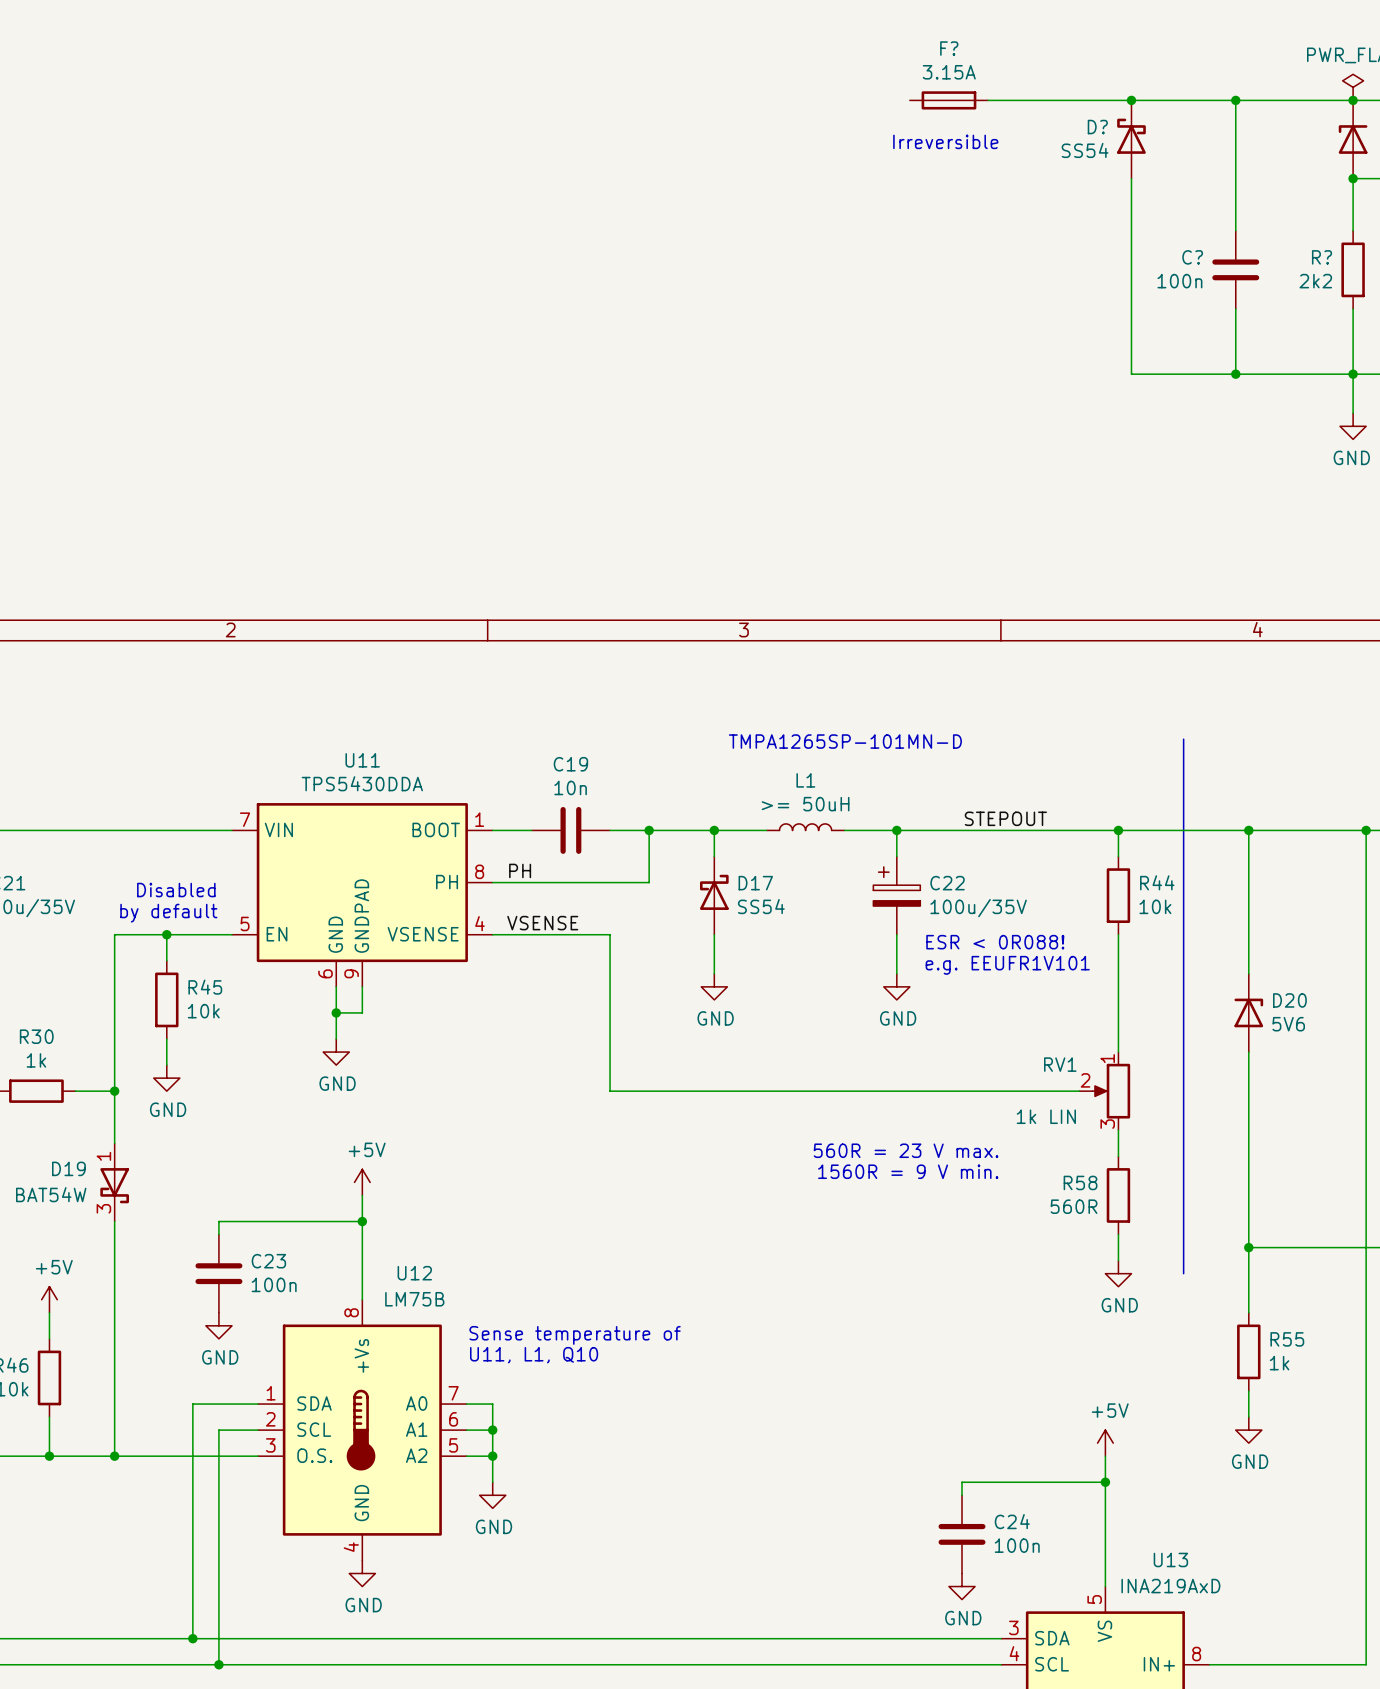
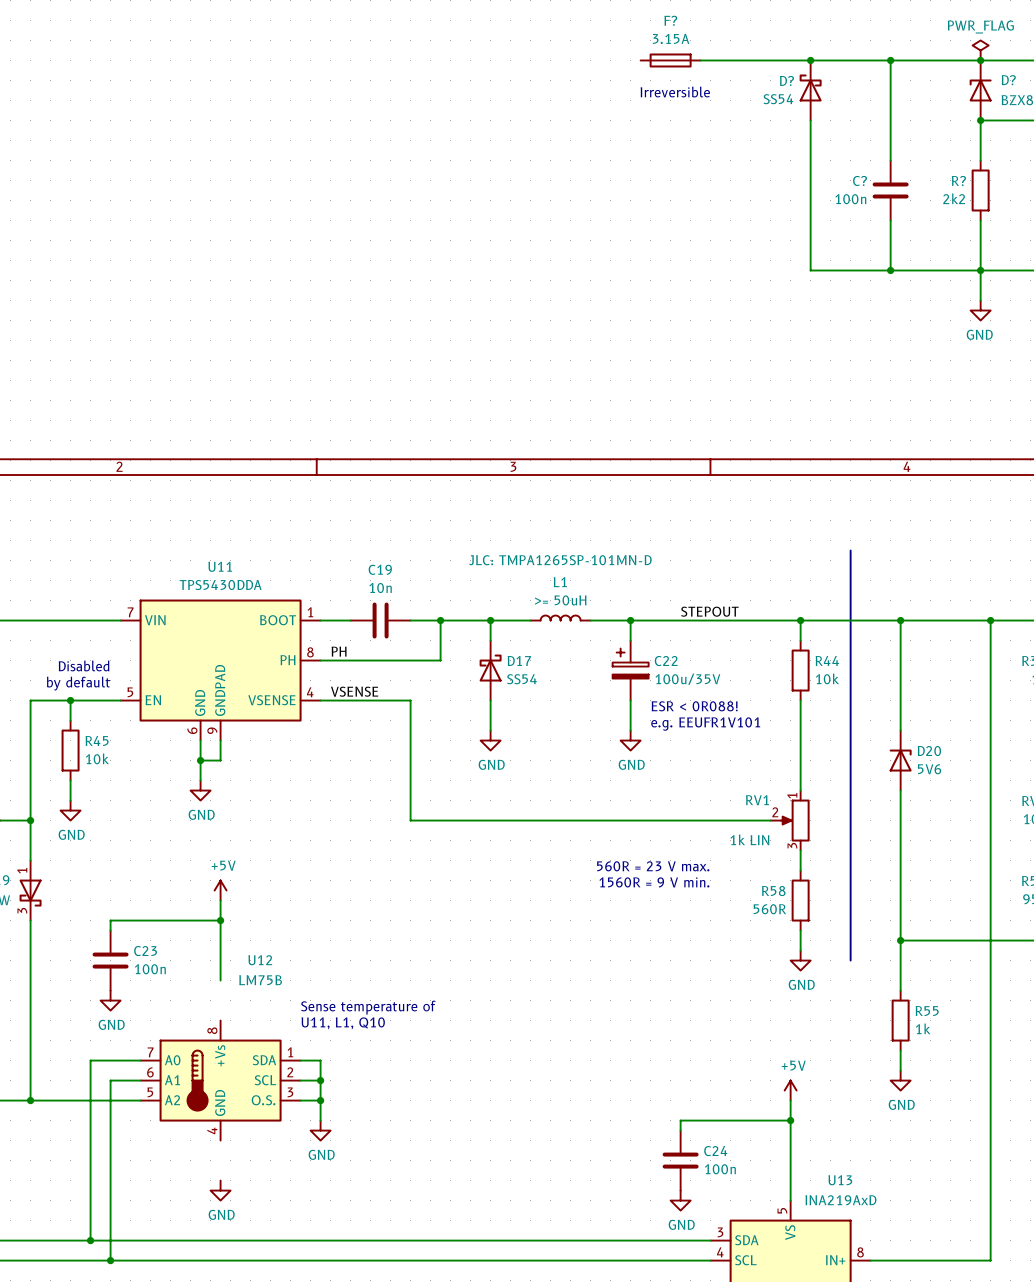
text: TMPA1265SP-101MN-D (845, 741) -> none
L1 text: none -> JLC: TMPA1265SP-101MN-D (560, 560)
U12 symbol: [258, 1299, 467, 1561] -> [140, 1020, 301, 1141]

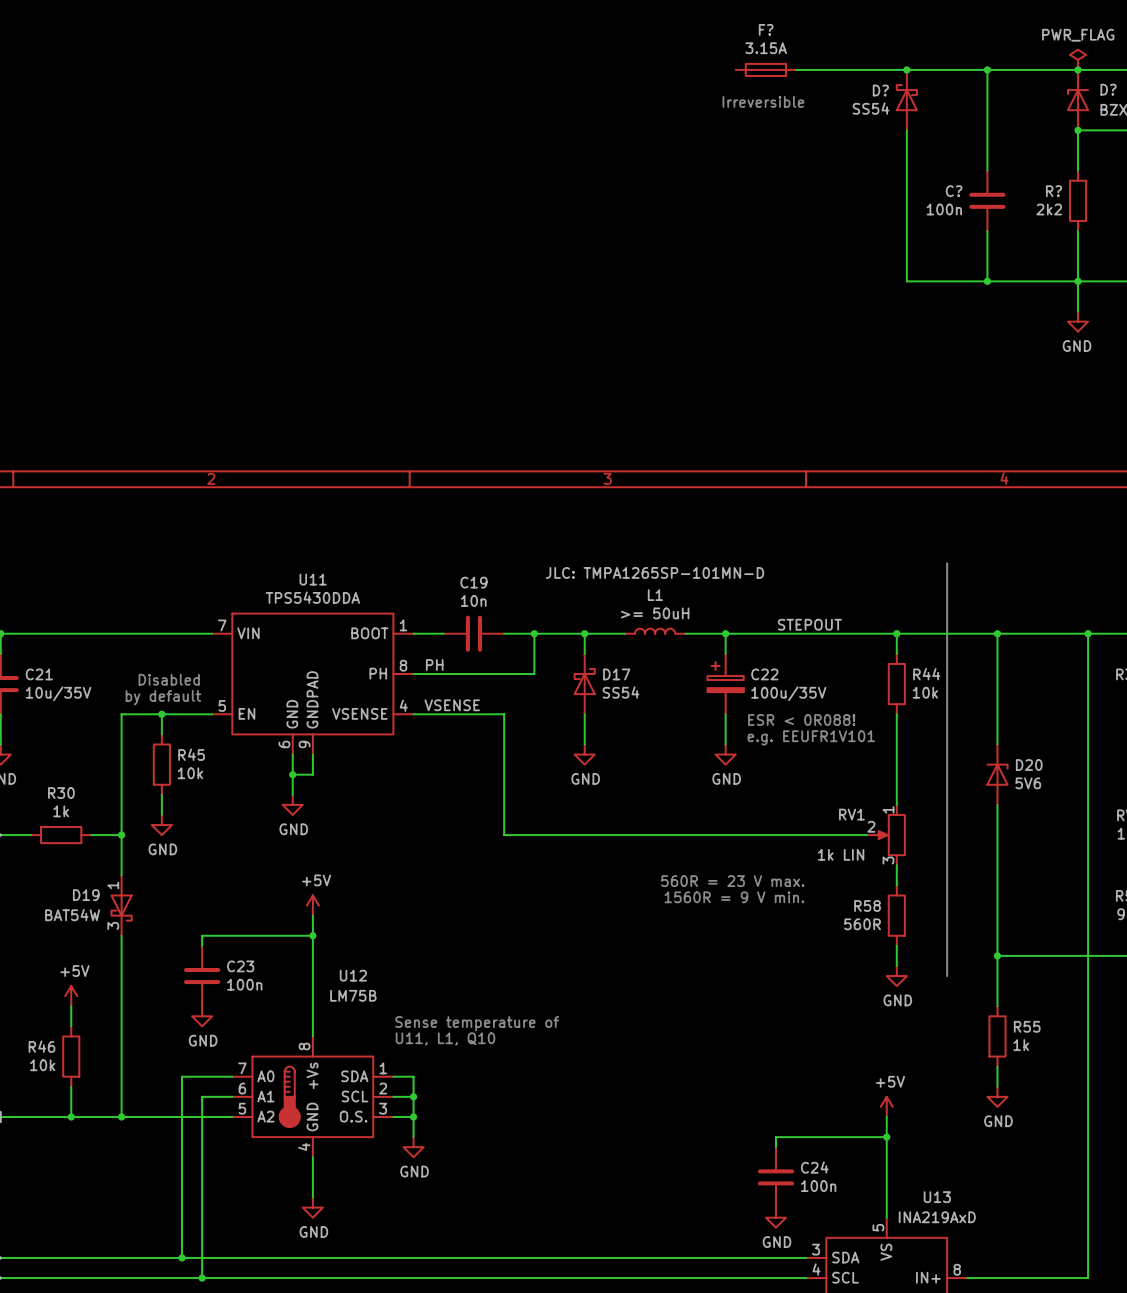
wire: none -> (312, 996) (312, 1036)
wire: none -> (312, 1157) (312, 1197)

